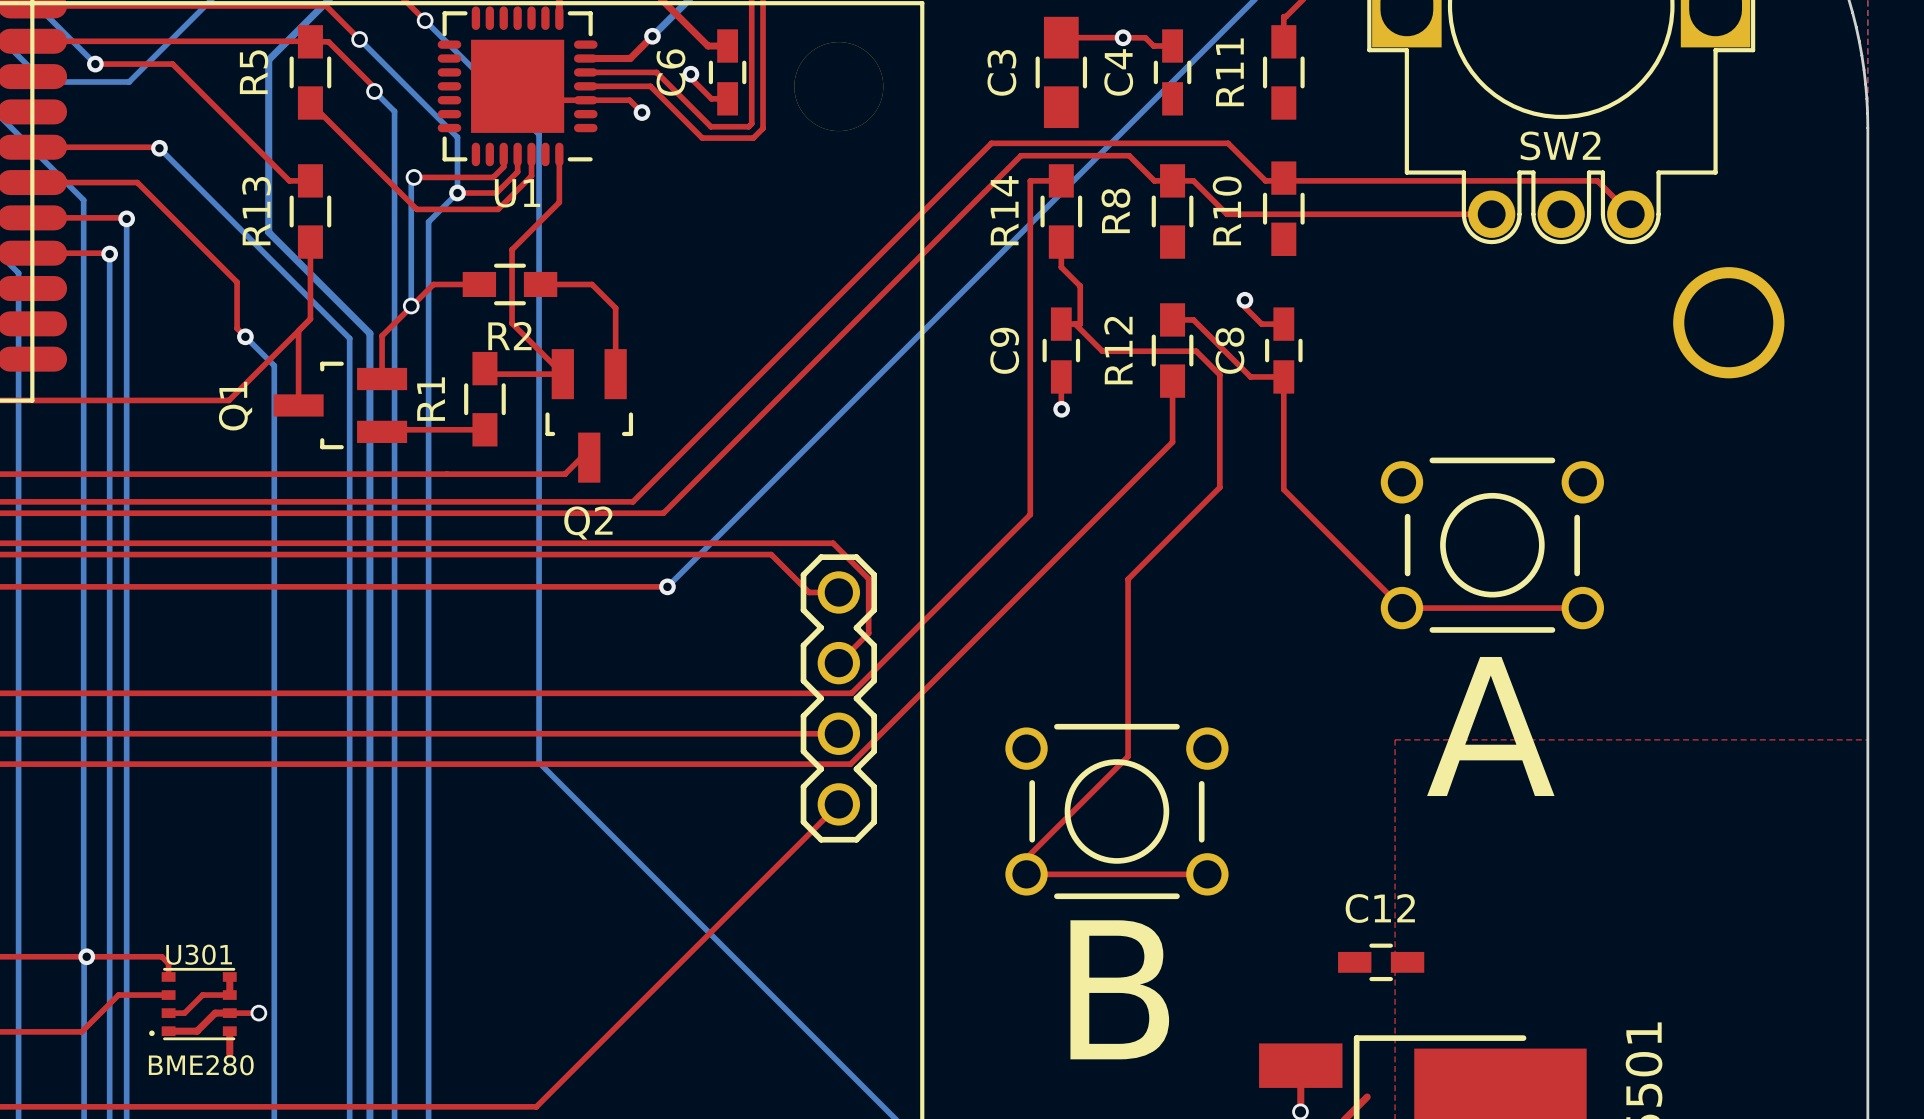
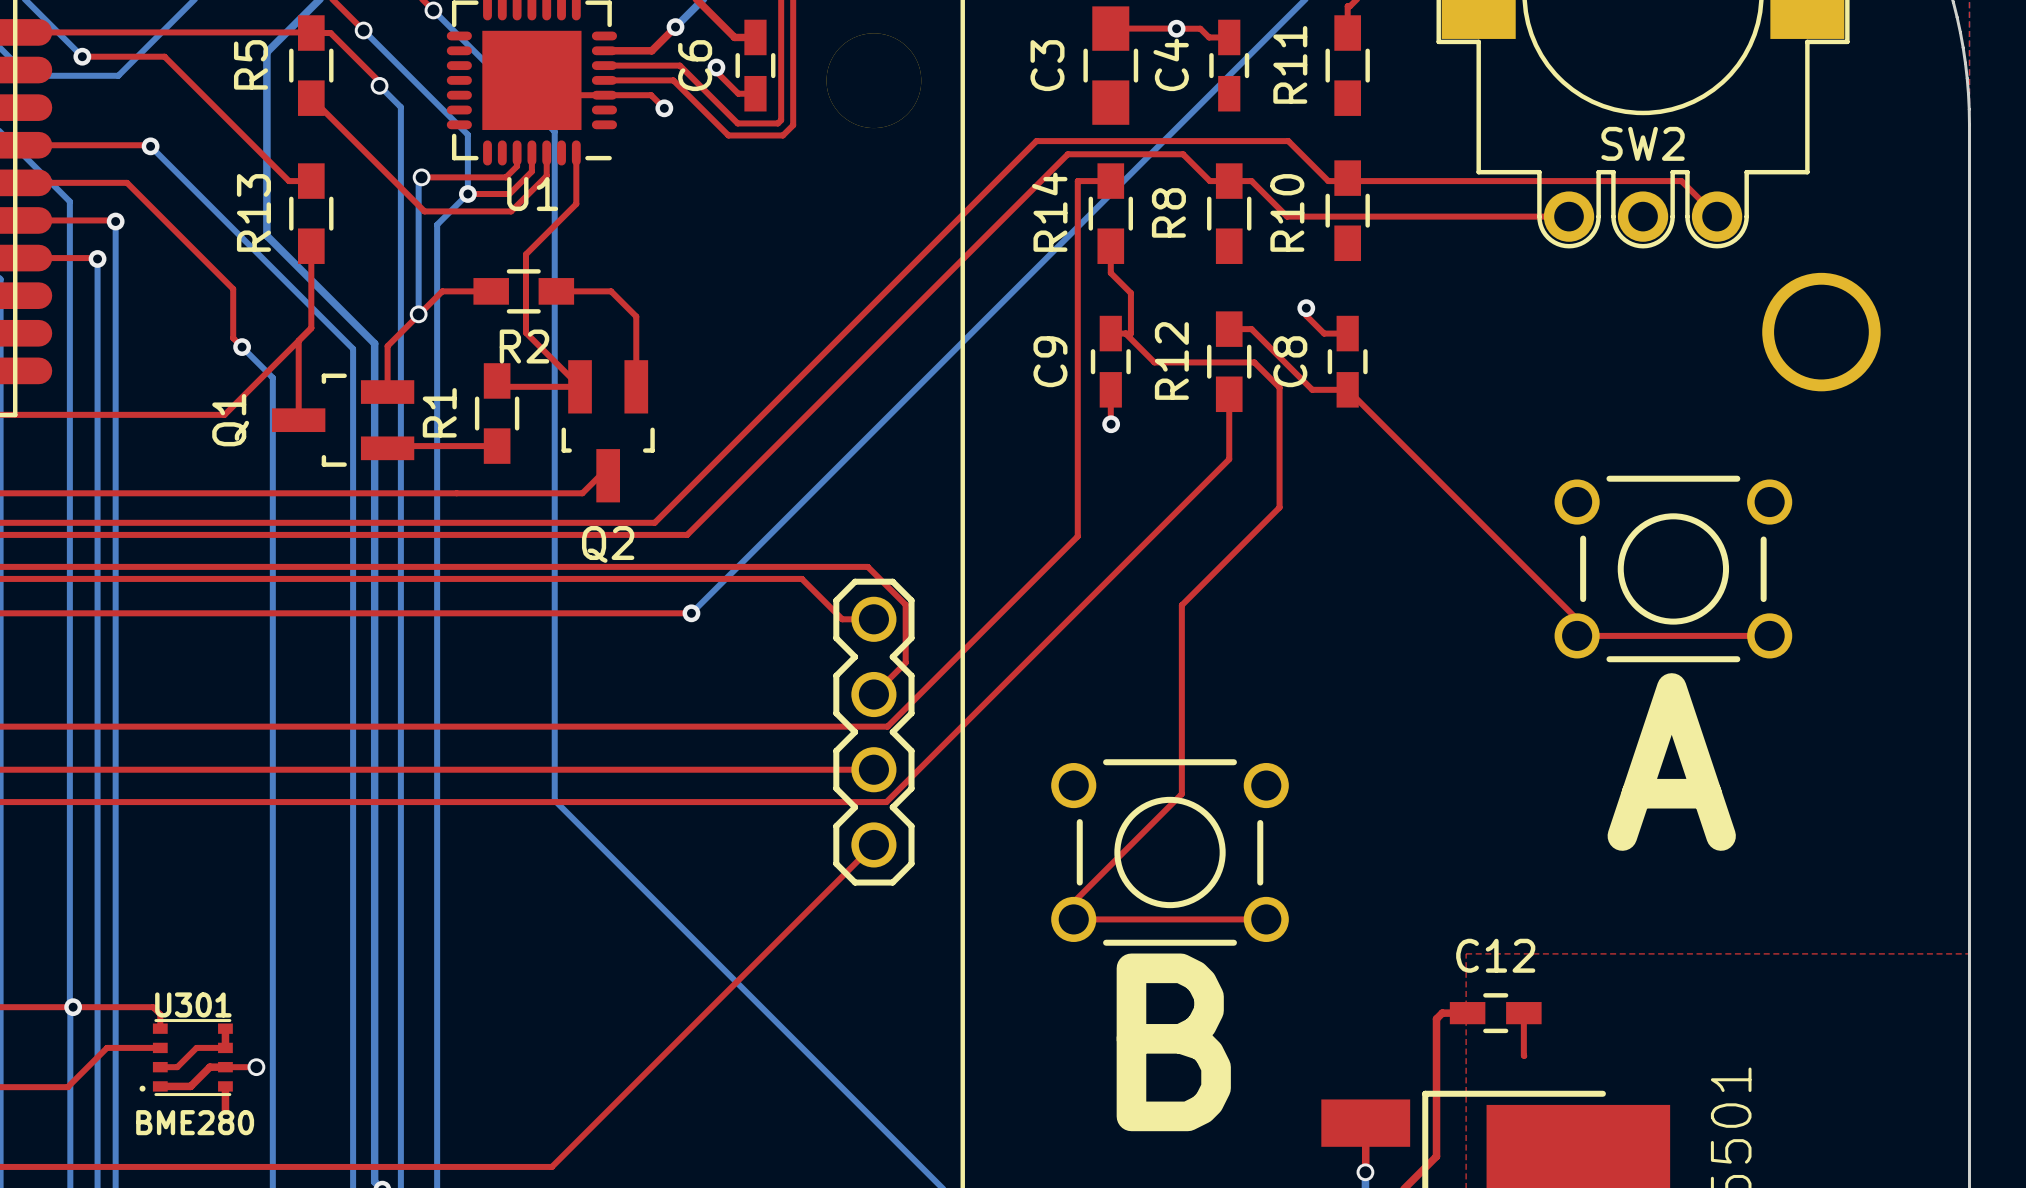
top track: (1283, 376) (1283, 489) (1402, 608) -> (1347, 389) (1577, 619) (1577, 635)
part position: (1492, 545) -> (1673, 568)
top track: (1401, 608) (1499, 608) -> (1666, 635) (1769, 635)
top zone outline: (1867, 739) (1395, 739) (1395, 906) -> (1969, 953) (1466, 953)
C12 position: (1381, 962) -> (1495, 1013)
top track: none -> (1467, 1013) (1442, 1013) (1436, 1018) (1436, 1156)
top track: none -> (1523, 1013) (1523, 1055)

